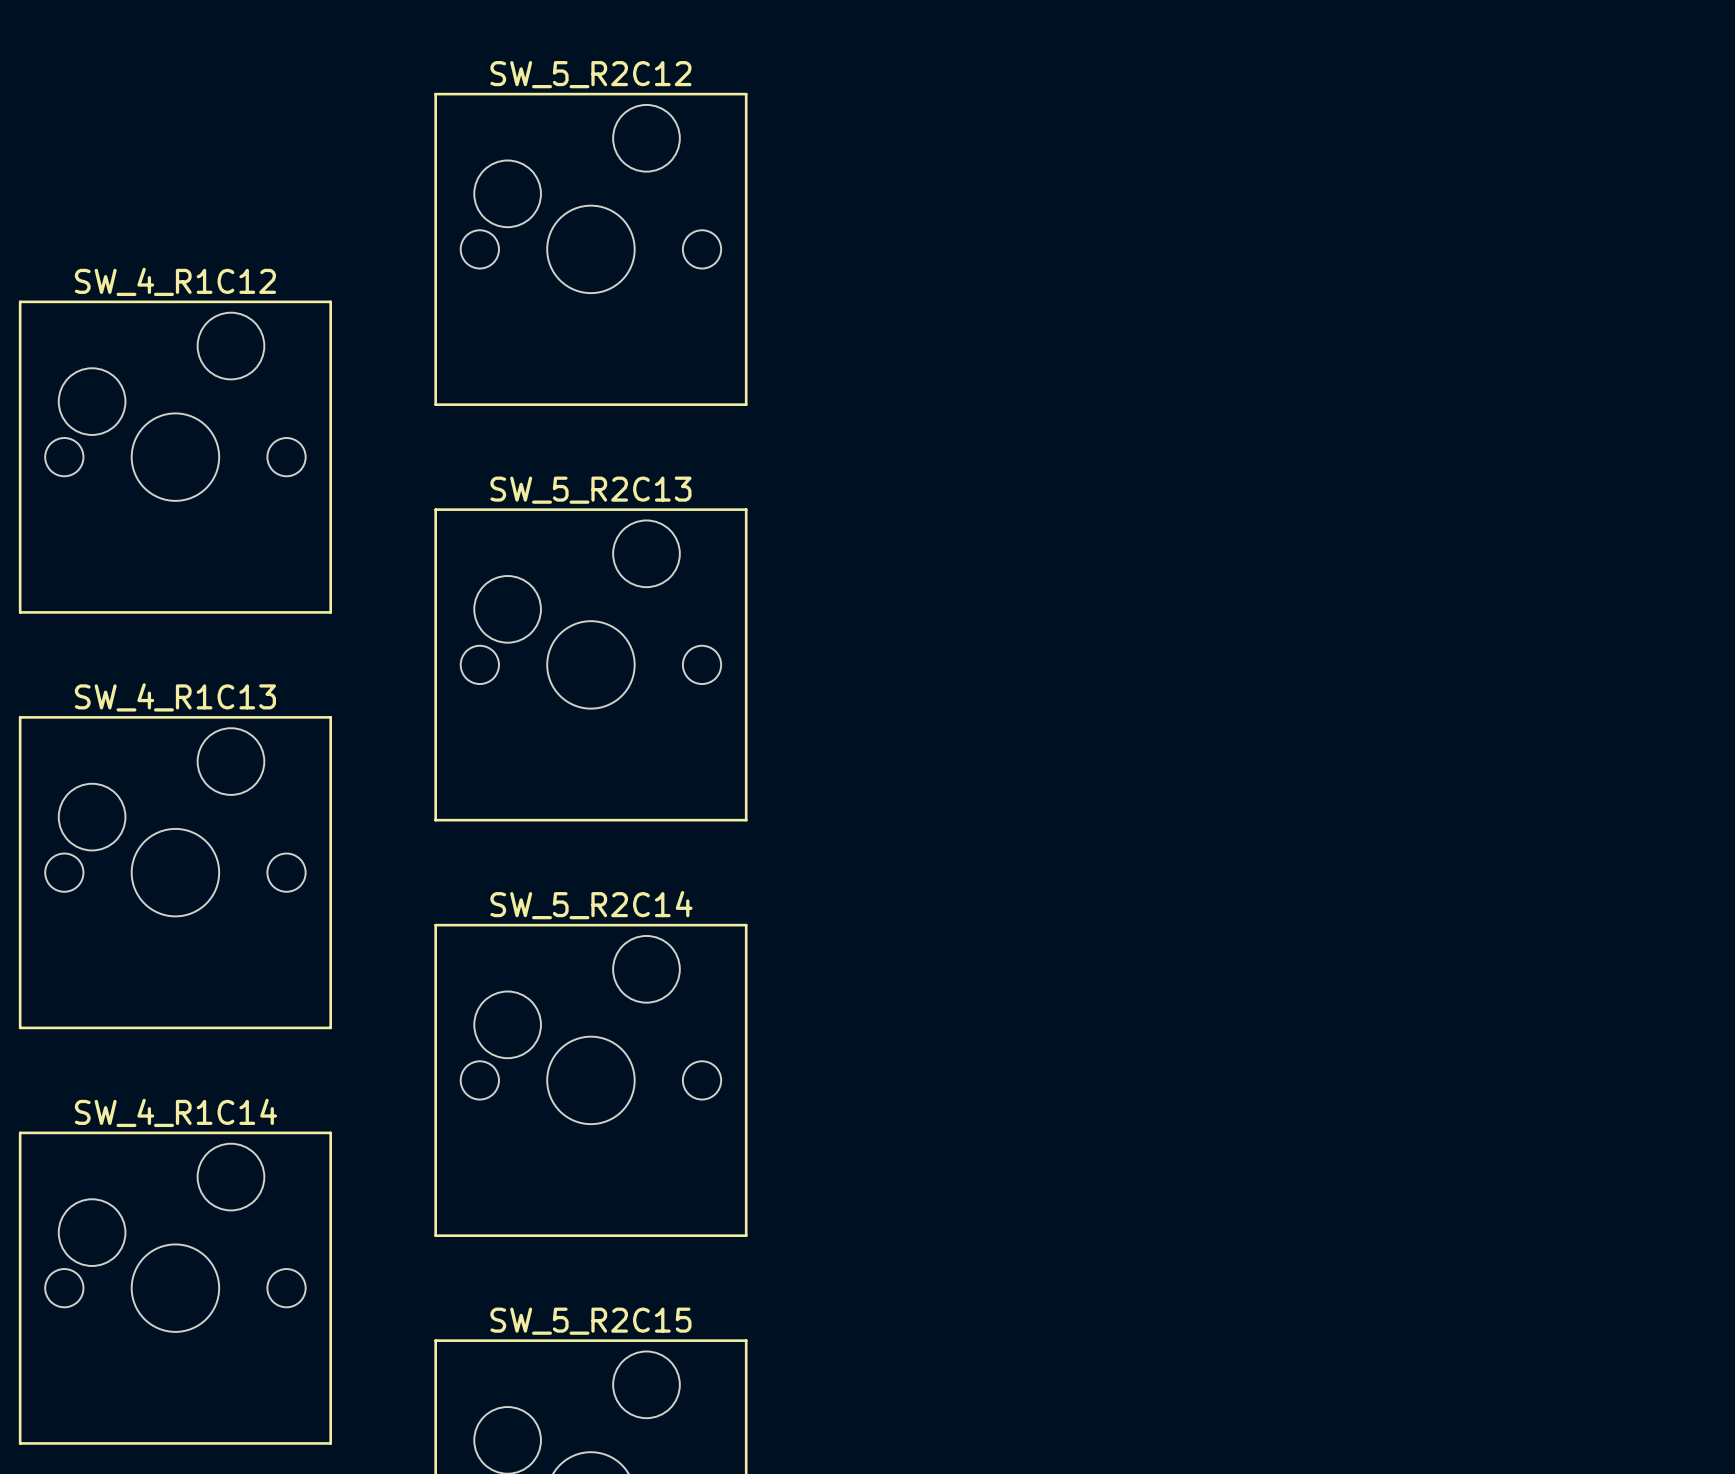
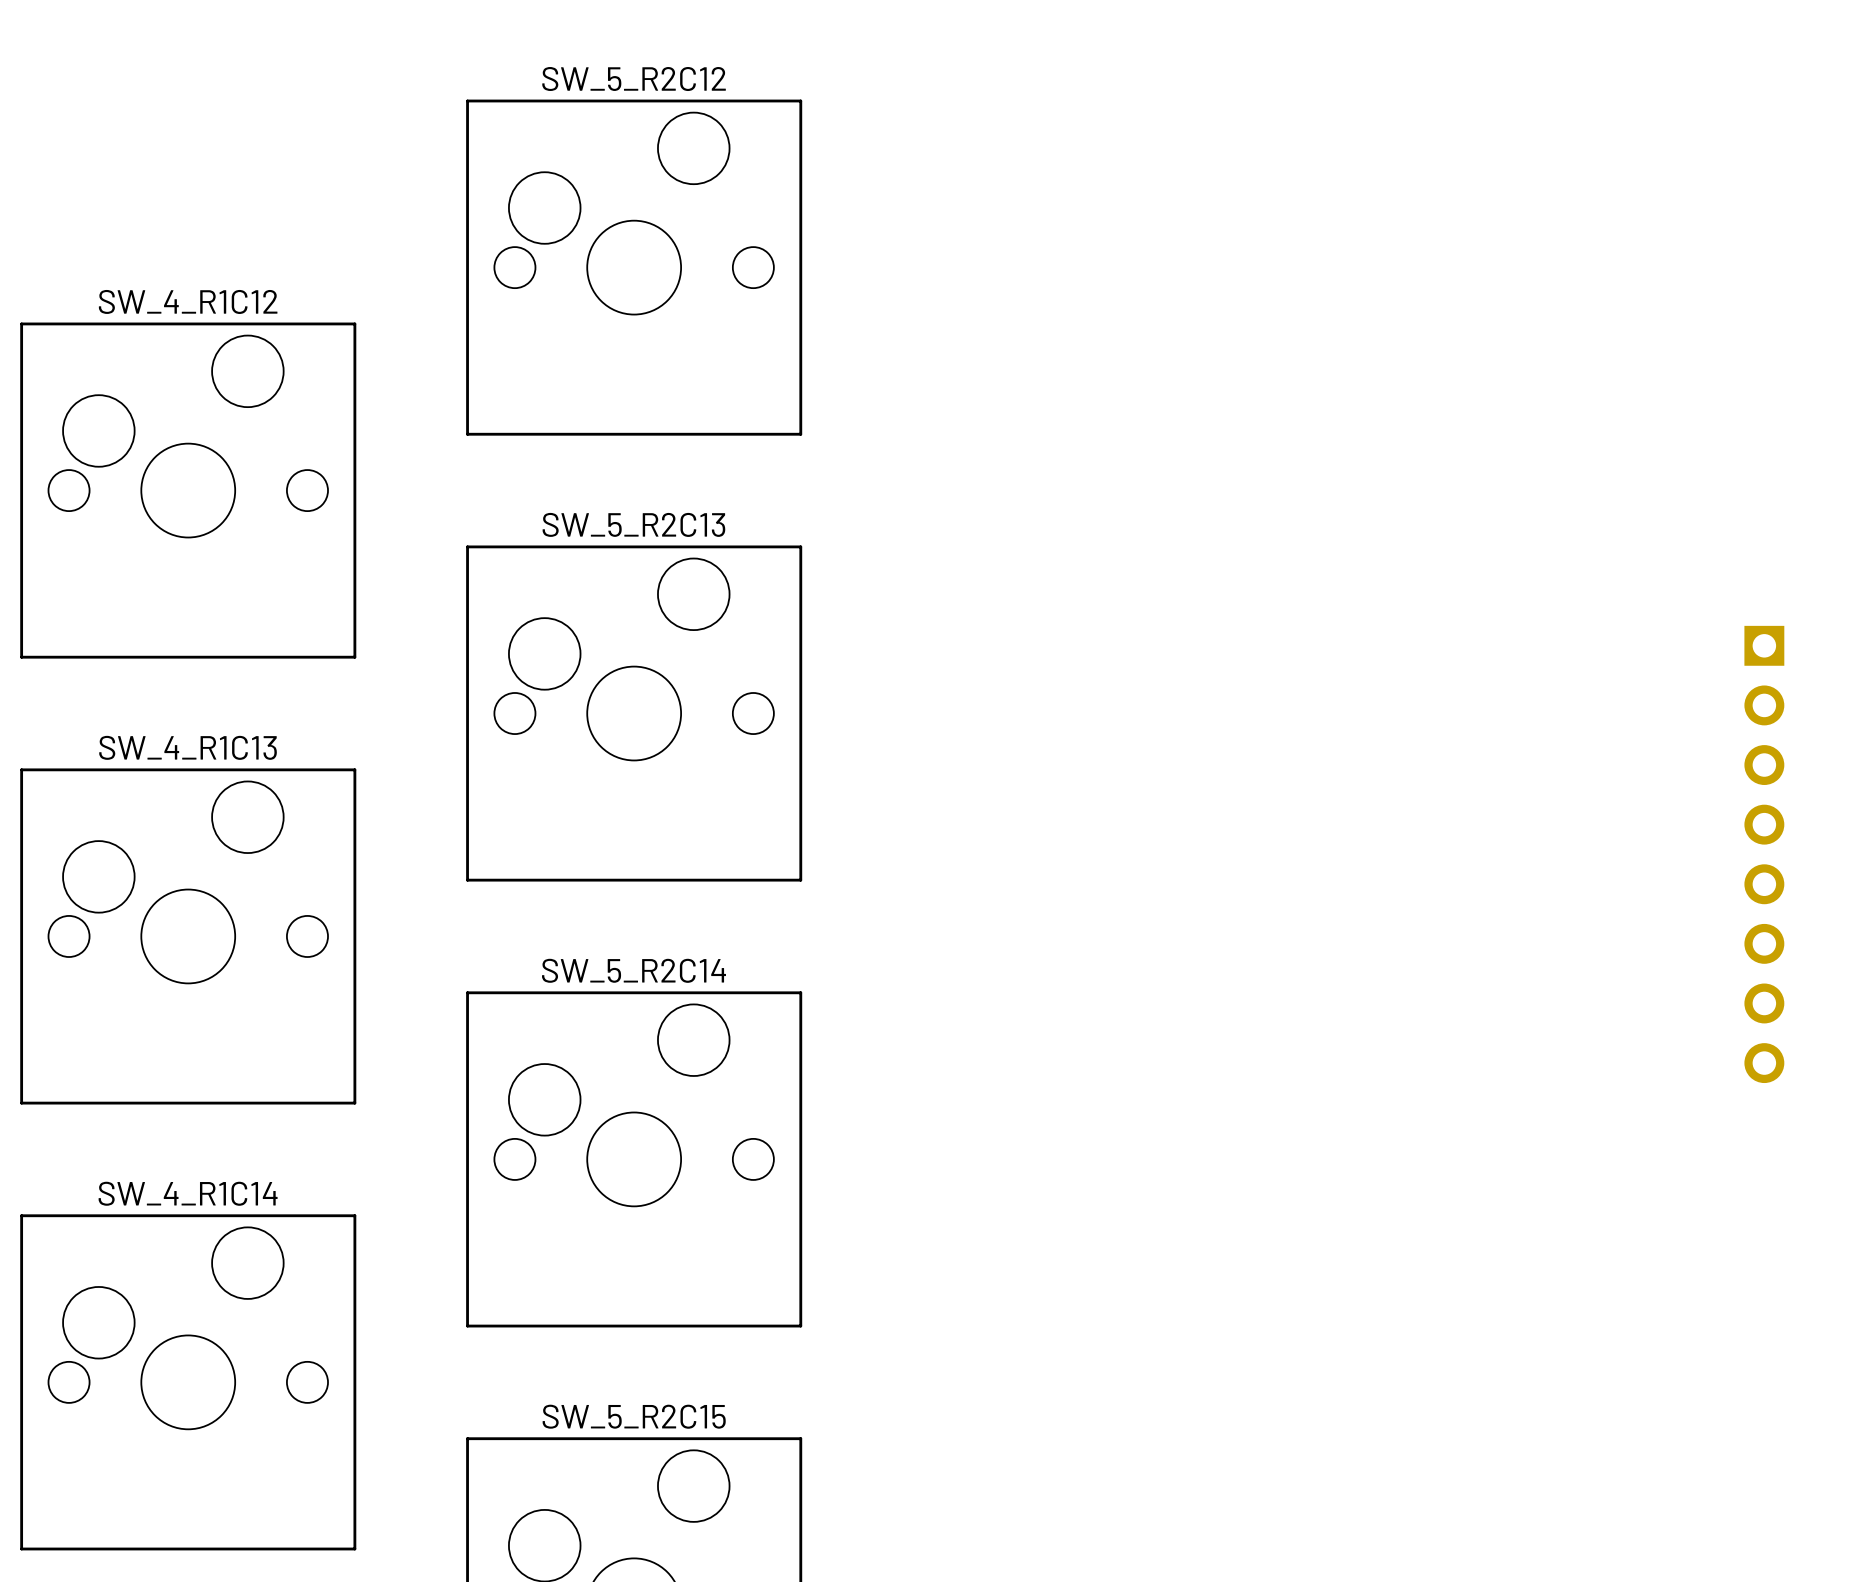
part: none -> (1764, 854)

